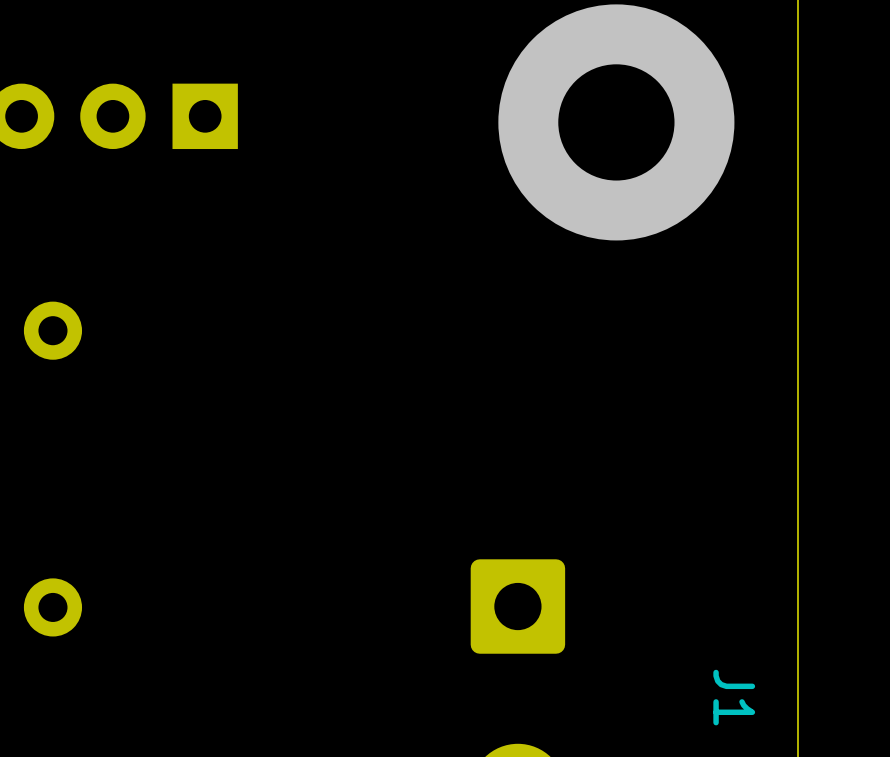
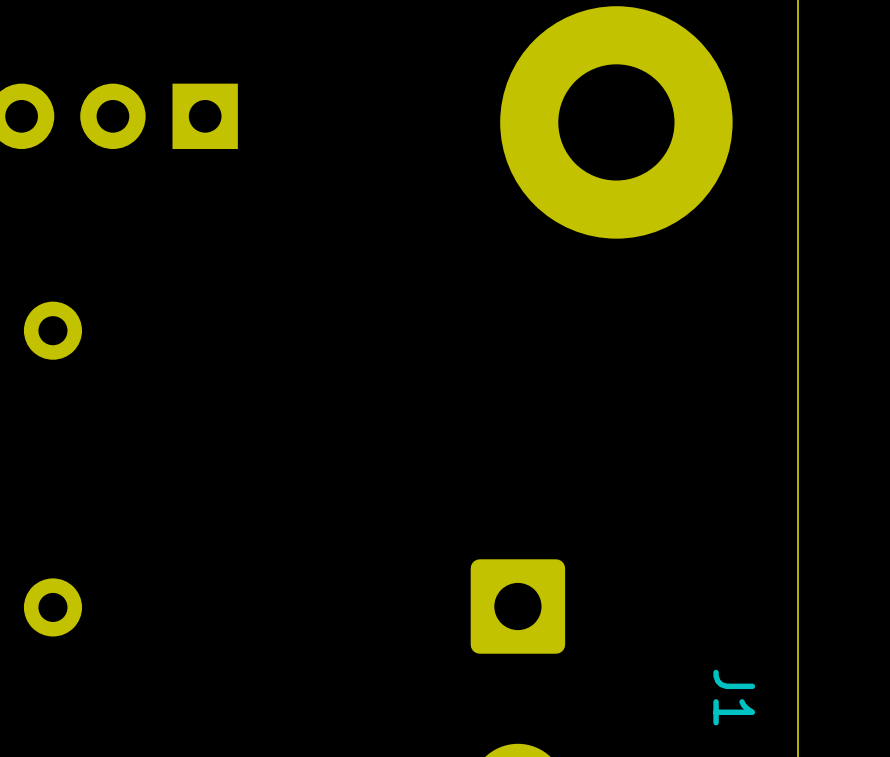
via: (616, 122) -> none
part: none -> (616, 122)

